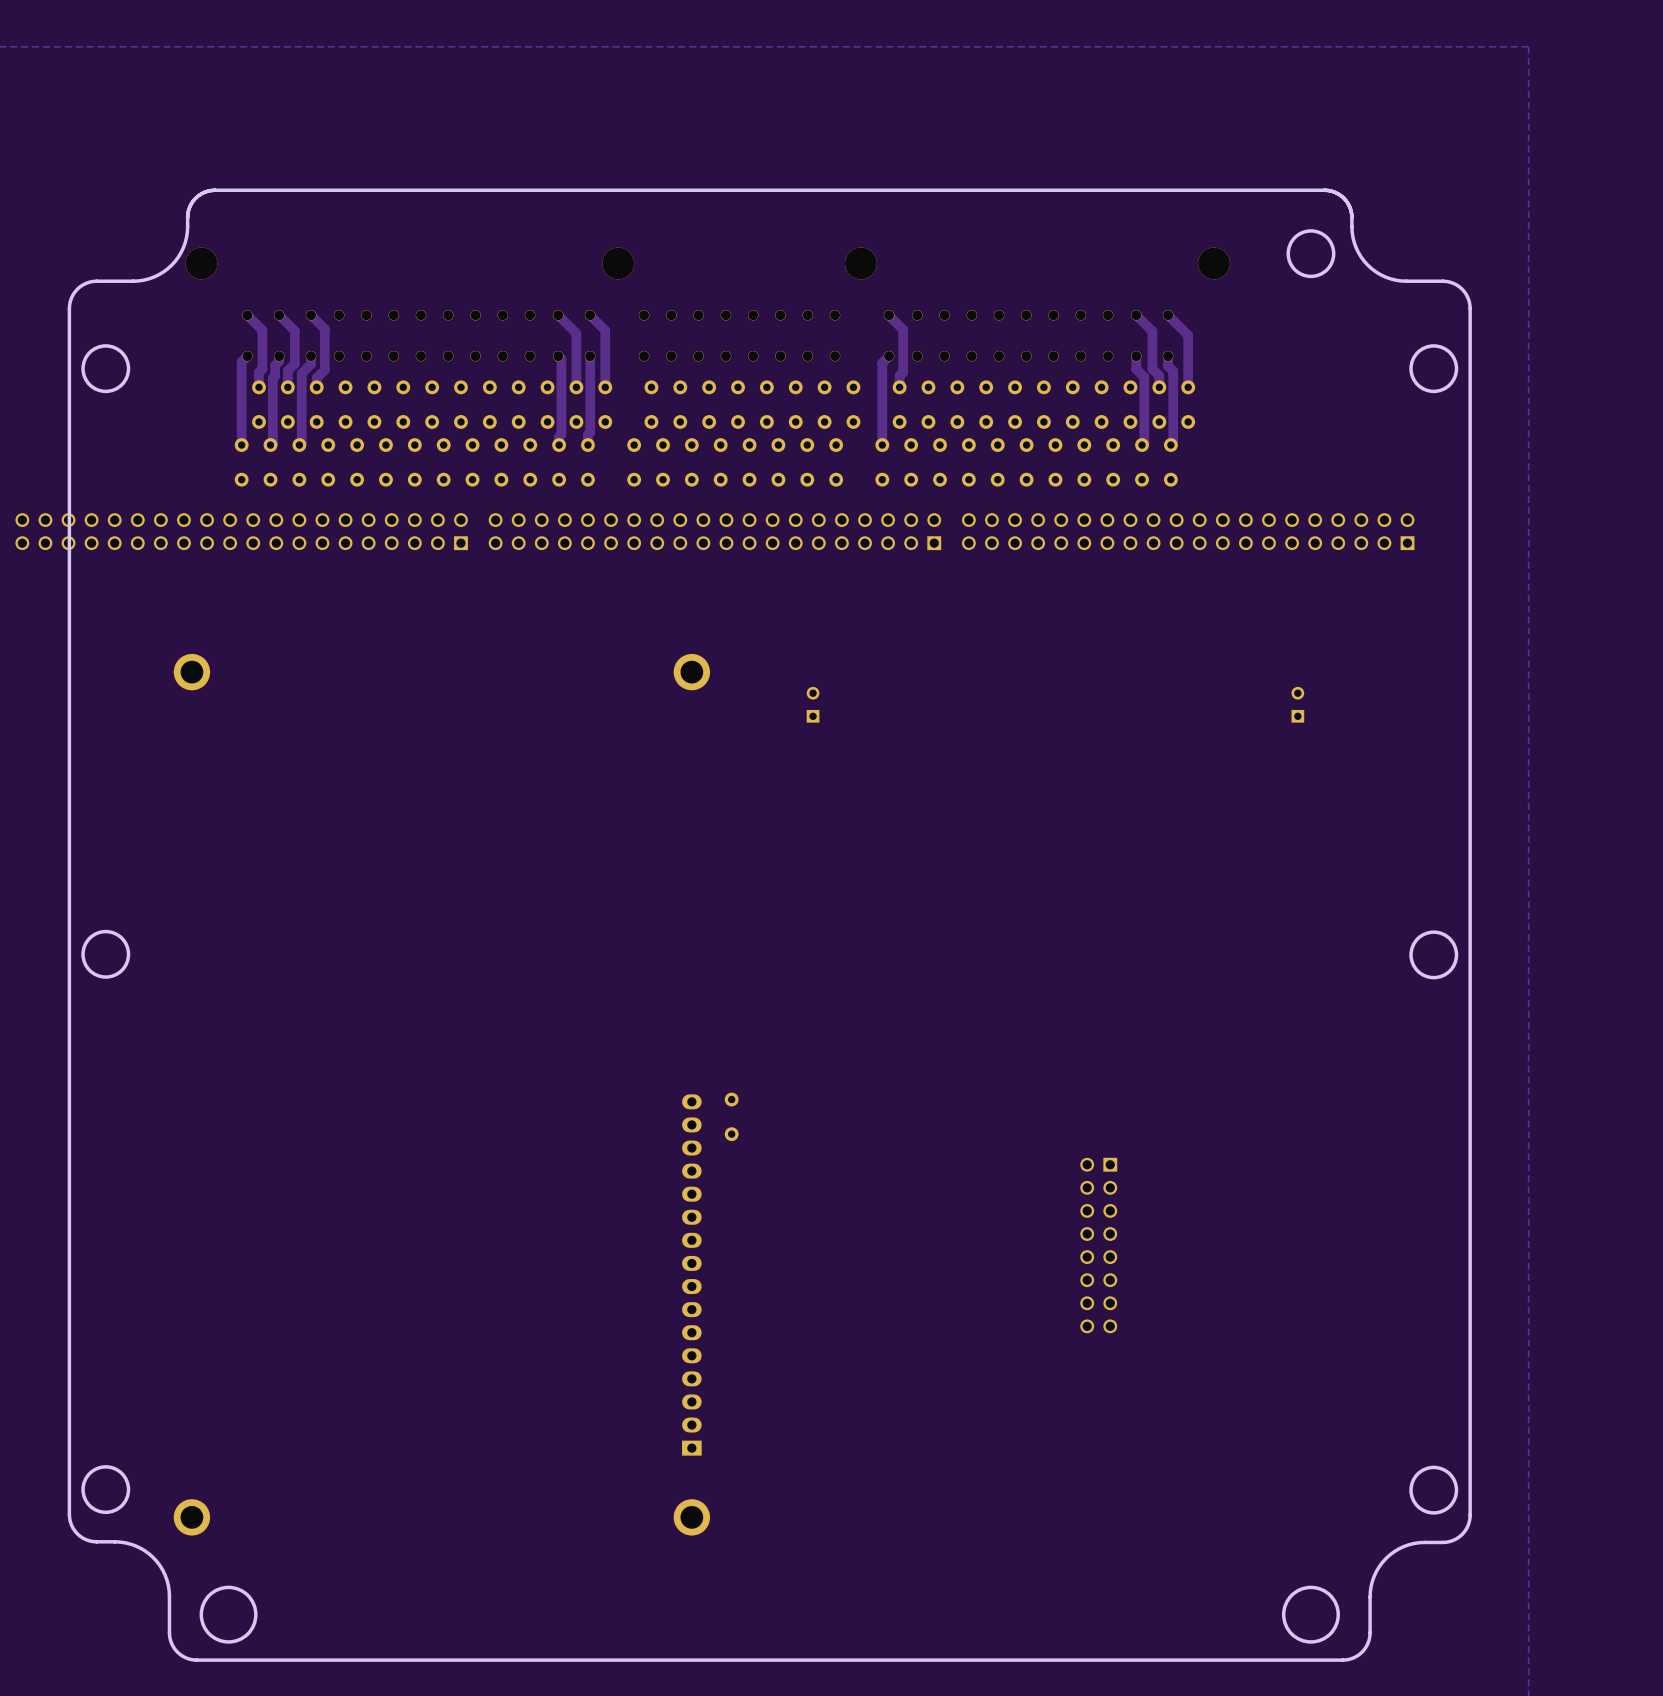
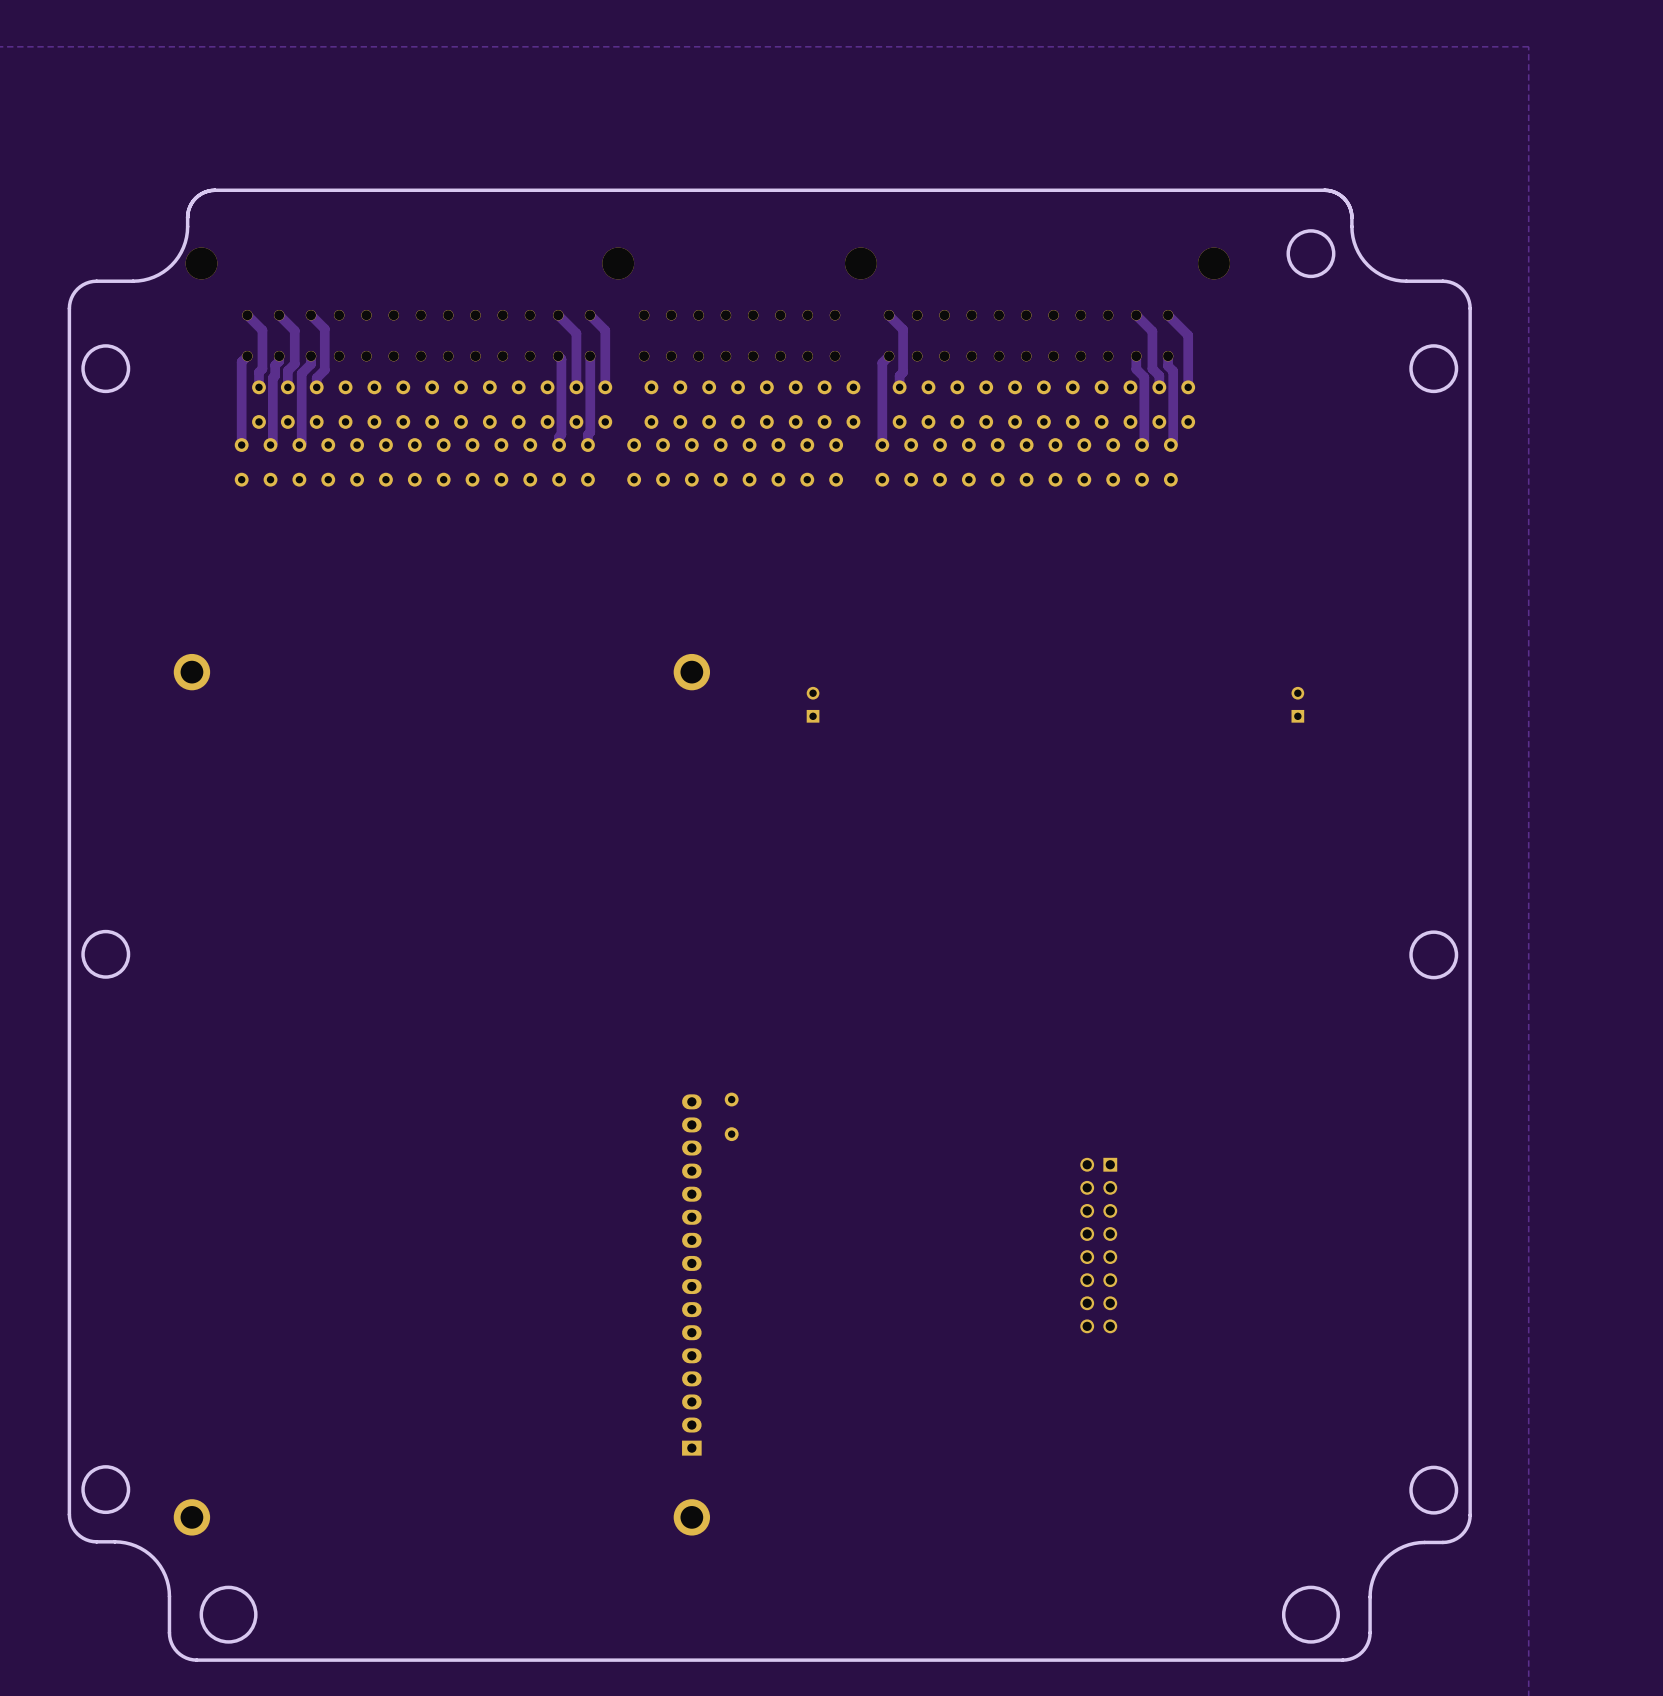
part: (241, 531) -> none
part: (714, 531) -> none
part: (1188, 531) -> none

